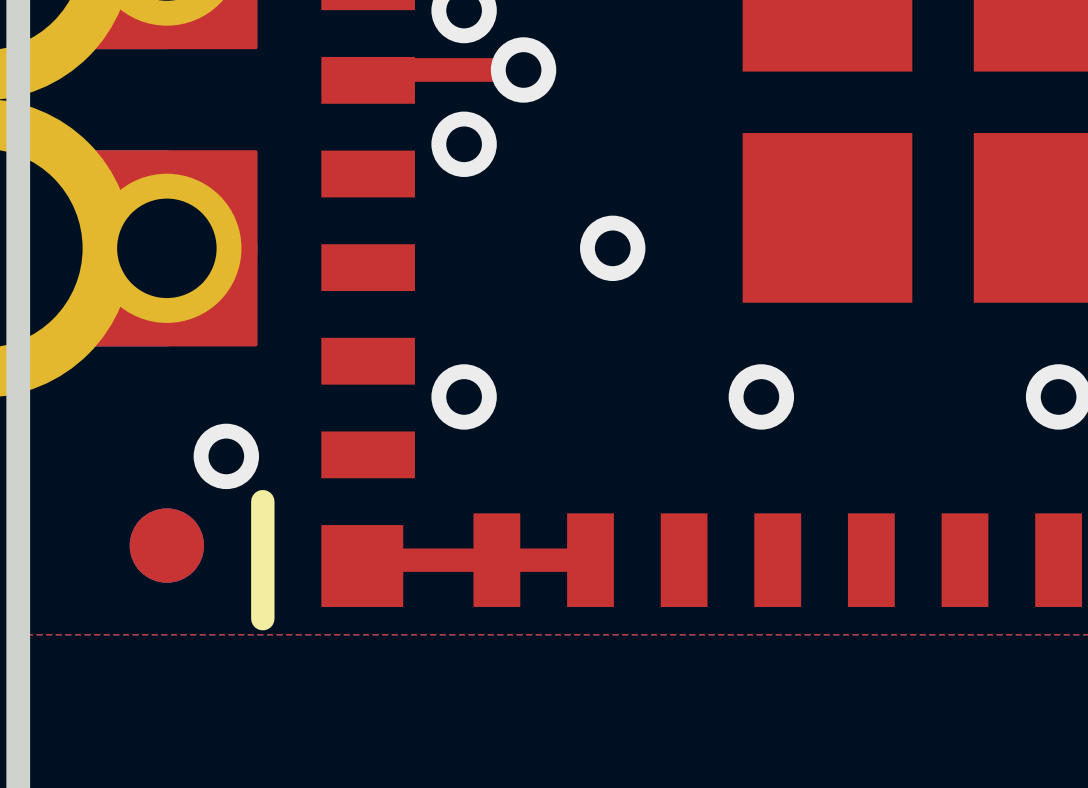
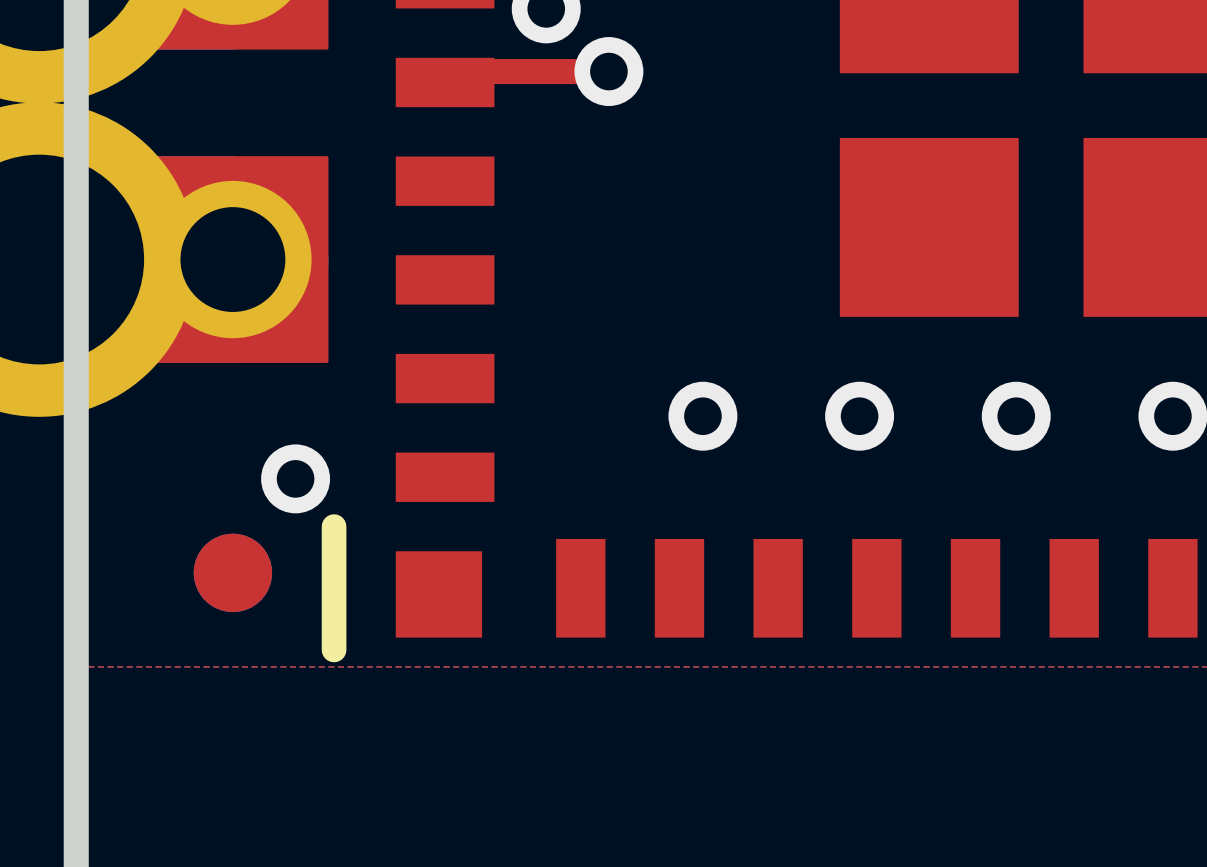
via: (464, 144) -> none
via: (612, 248) -> none
via: (464, 396) -> none
via: none -> (702, 416)
via: none -> (1016, 416)
top track: (590, 560) (368, 560) (362, 566) -> none

